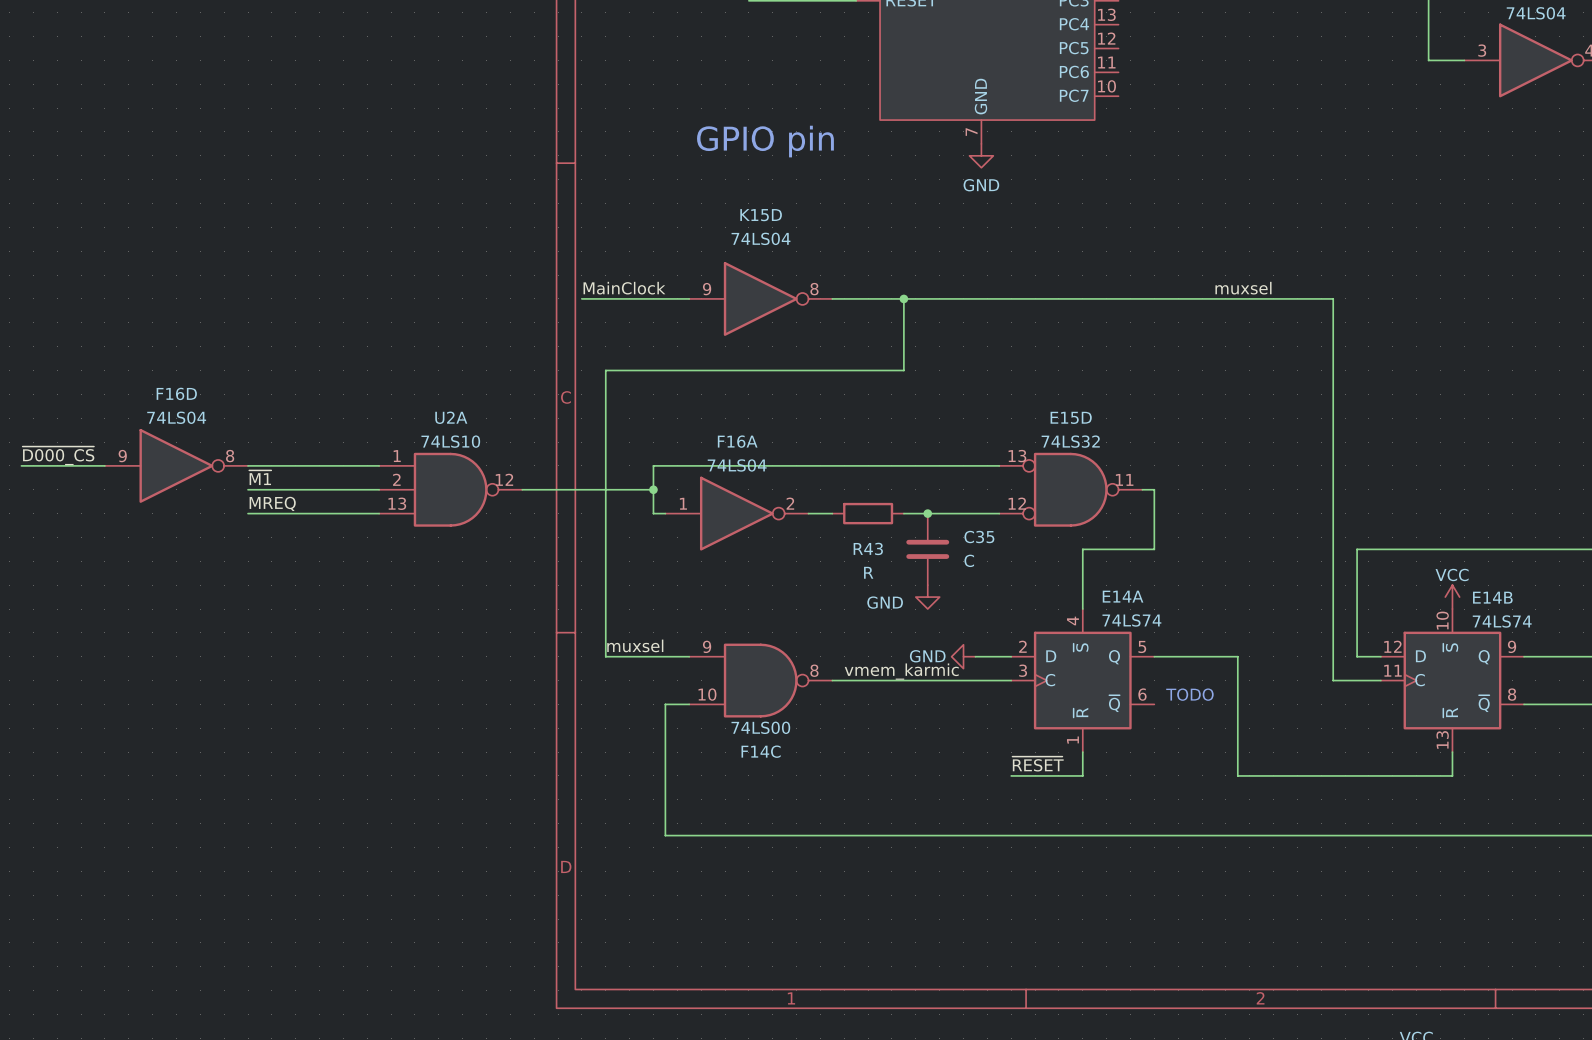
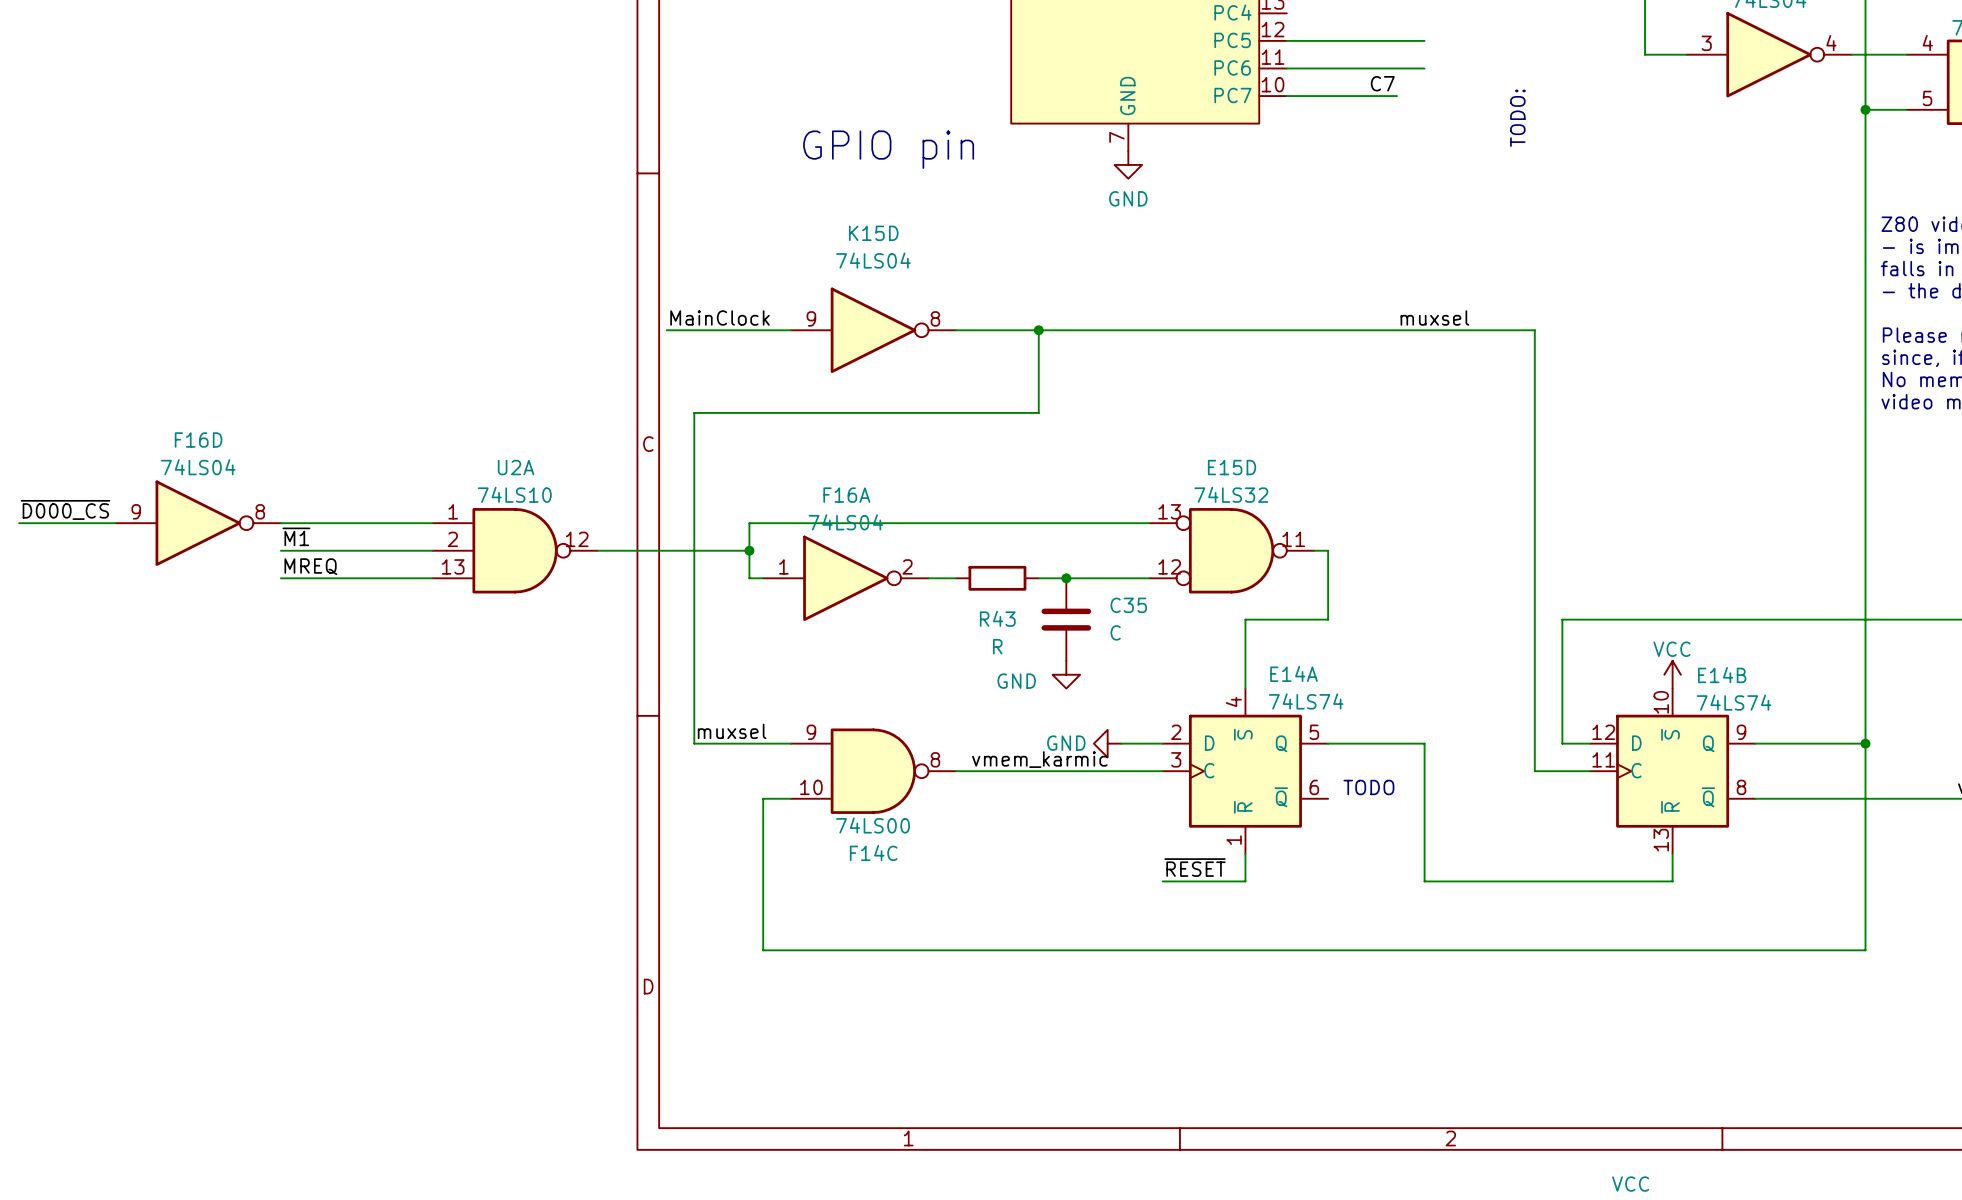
wire: none -> (1286, 40) (1424, 40)
wire: none -> (1286, 68) (1424, 68)
label: none -> C7 (1382, 83)
wire: none -> (1286, 96) (1397, 96)
text: none -> TODO: (1517, 118)

